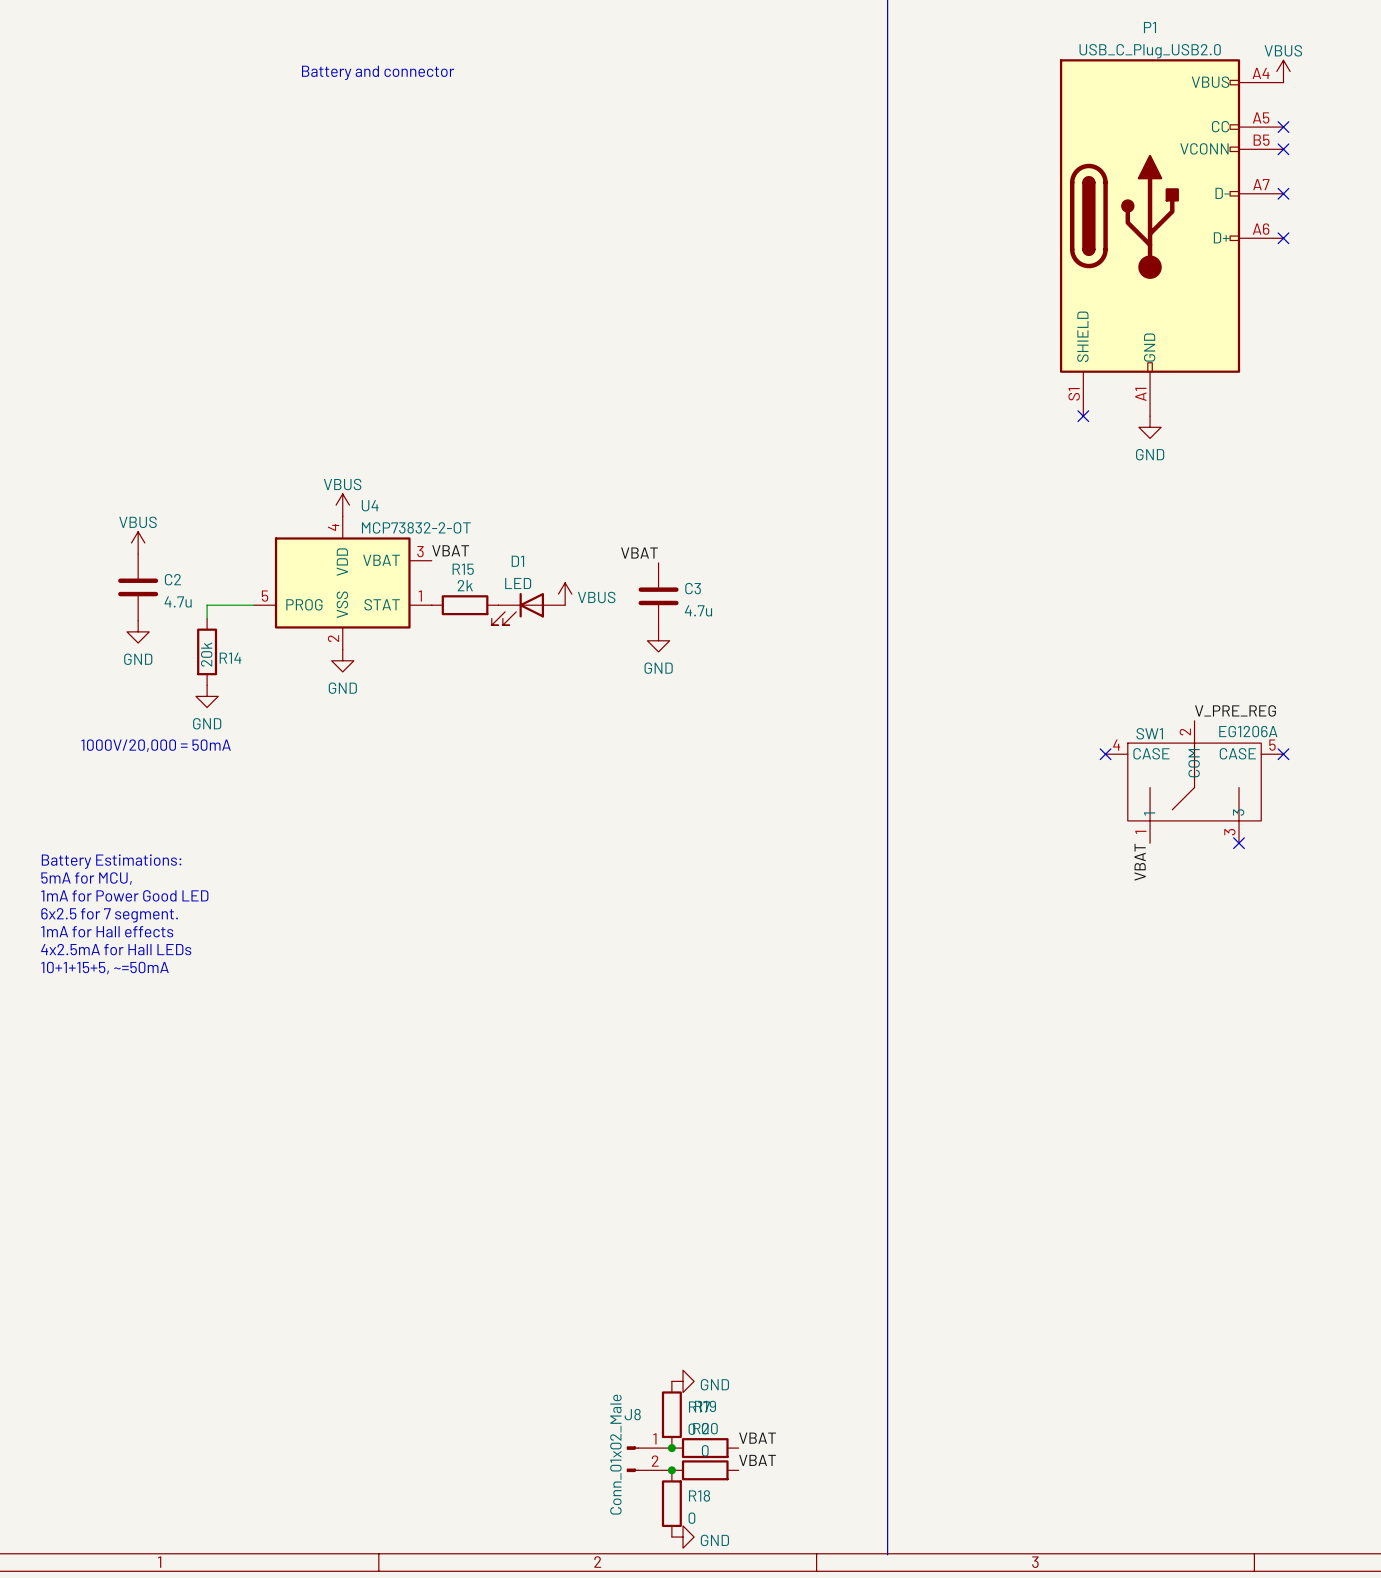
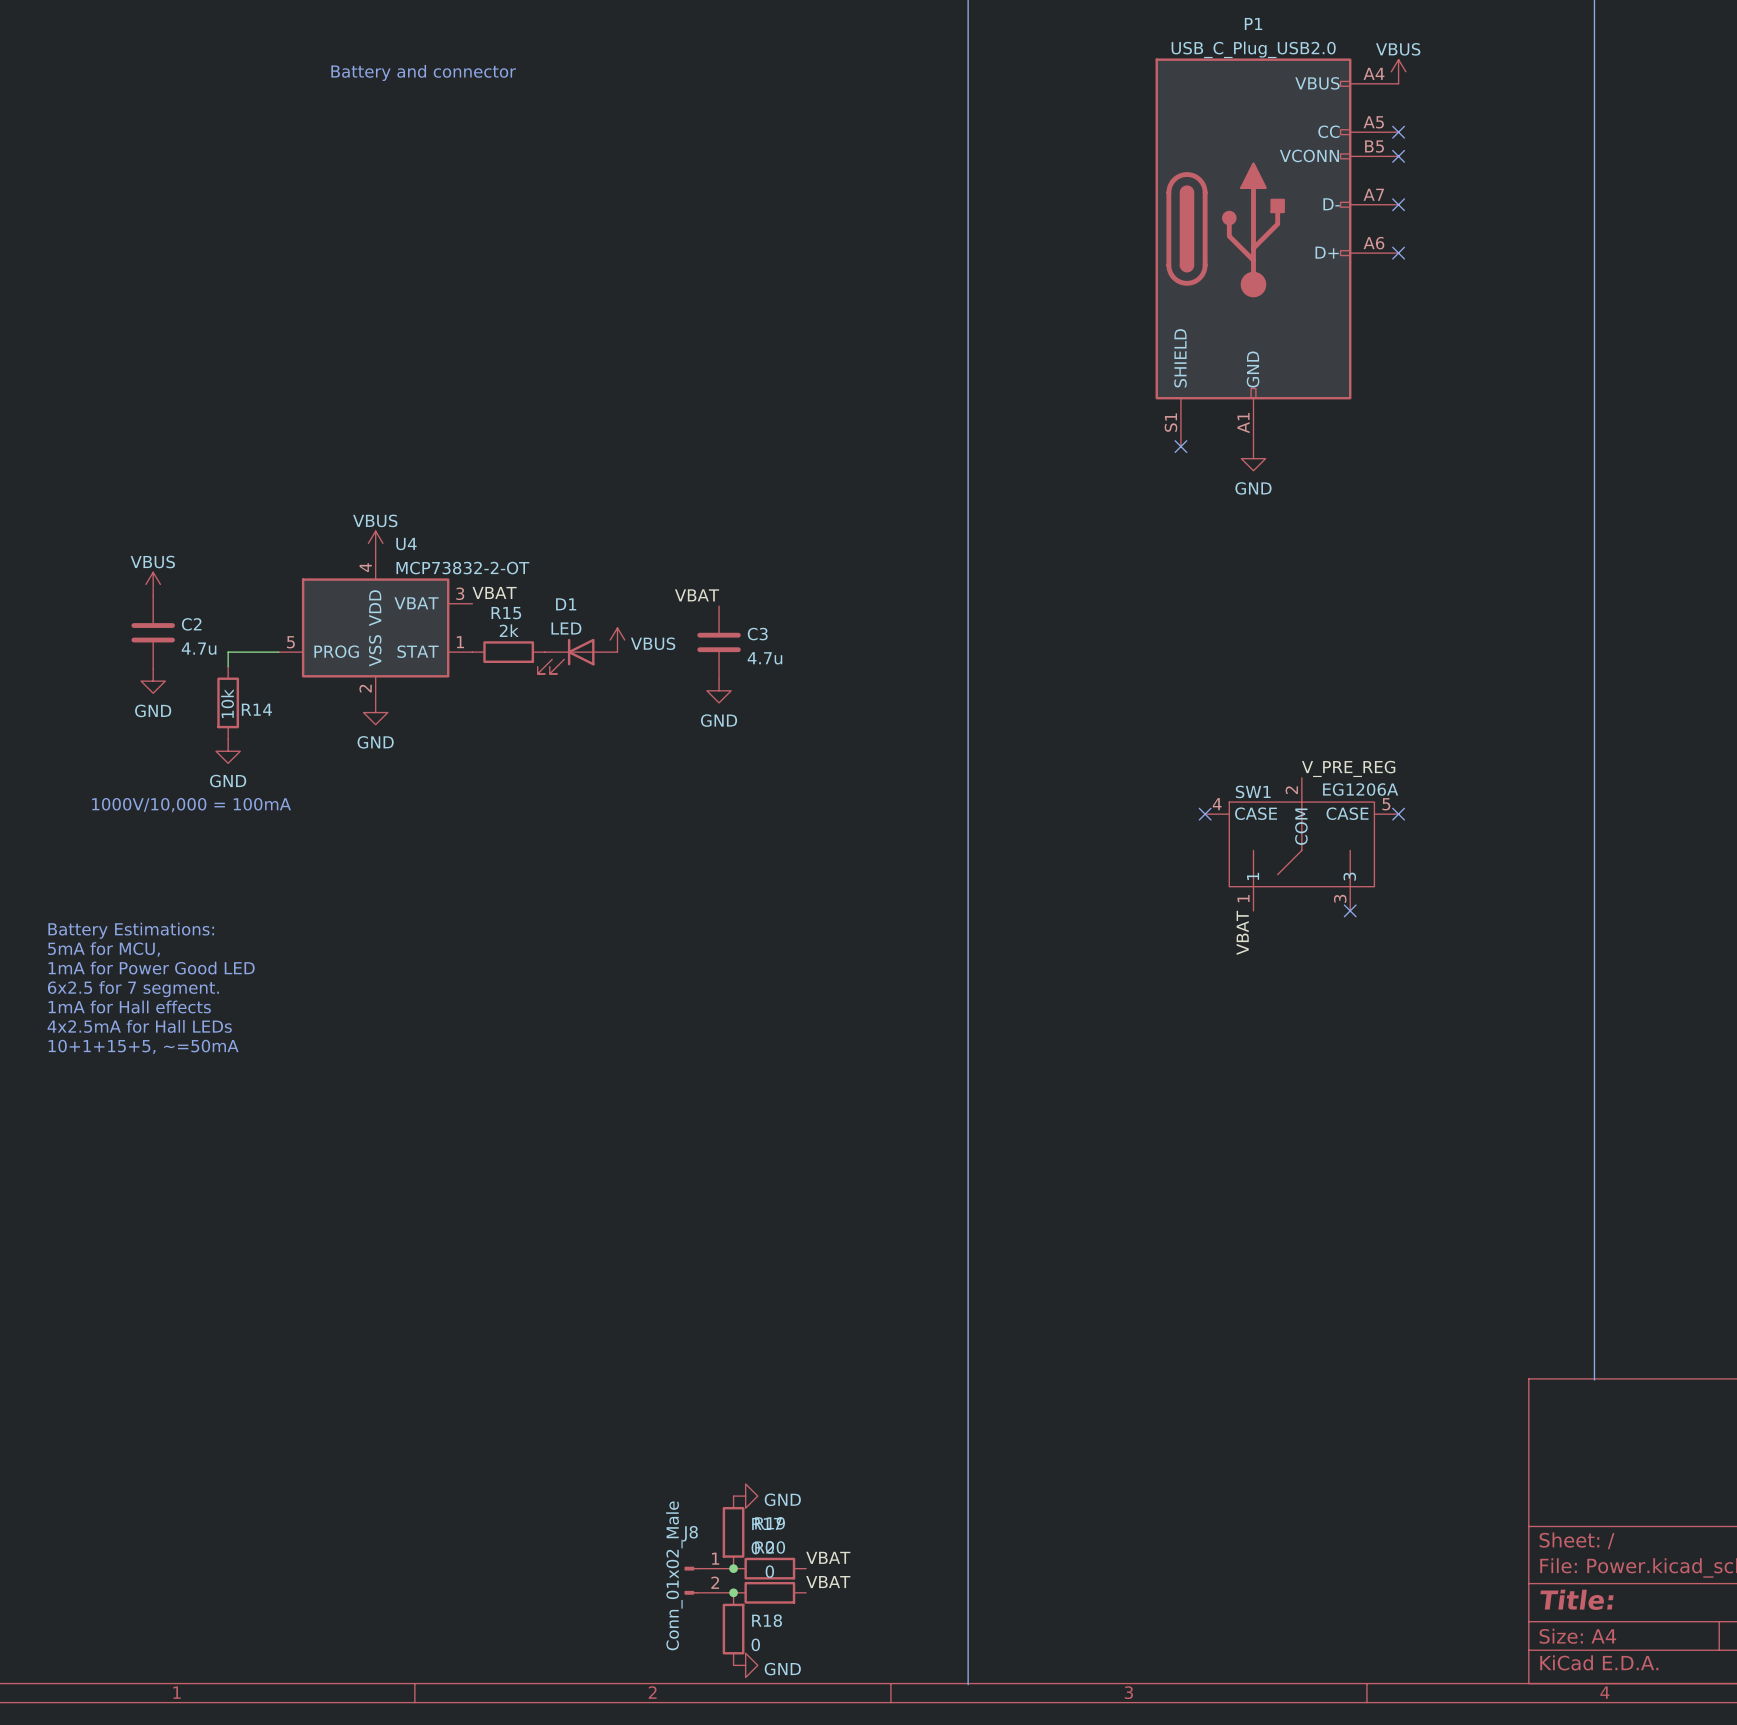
R14 value: 20k (206, 654) -> 10k (227, 703)
text: 1000V/20,000 = 50mA (156, 745) -> 1000V/10,000 = 100mA (191, 805)

